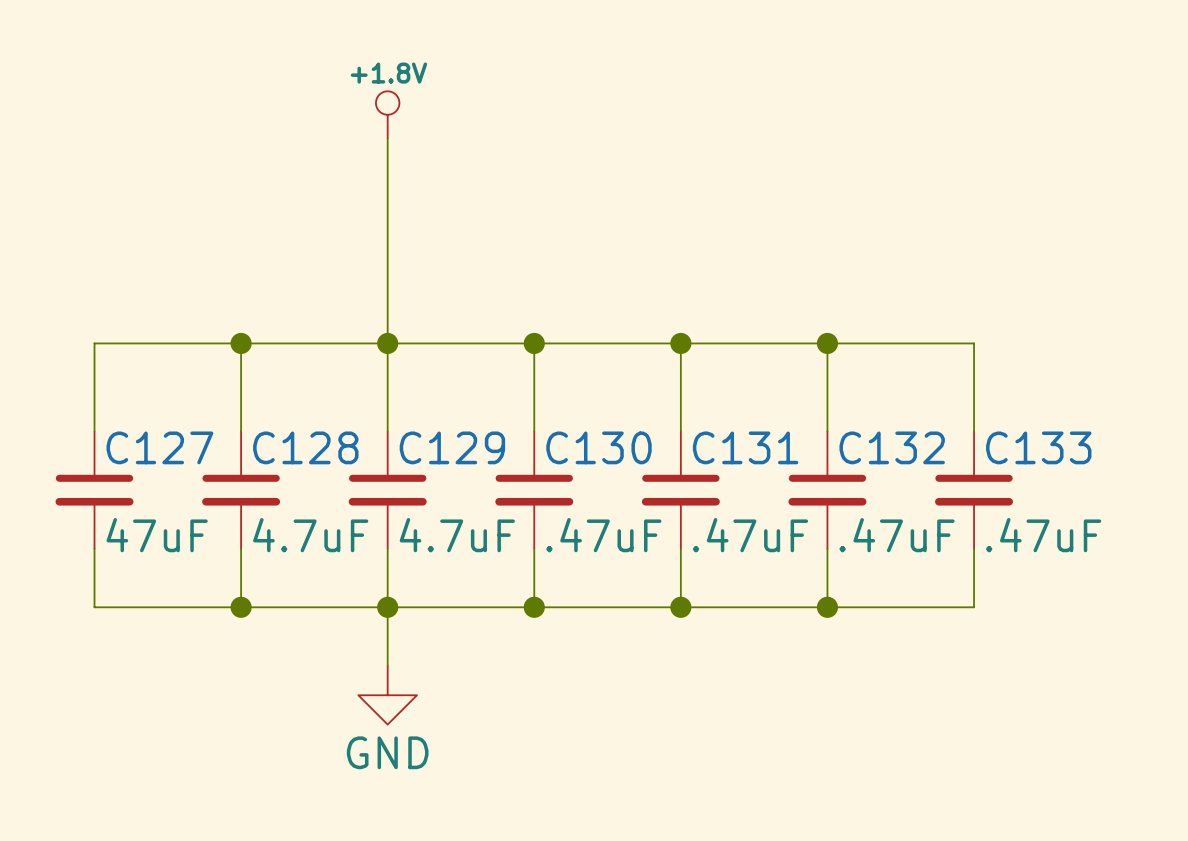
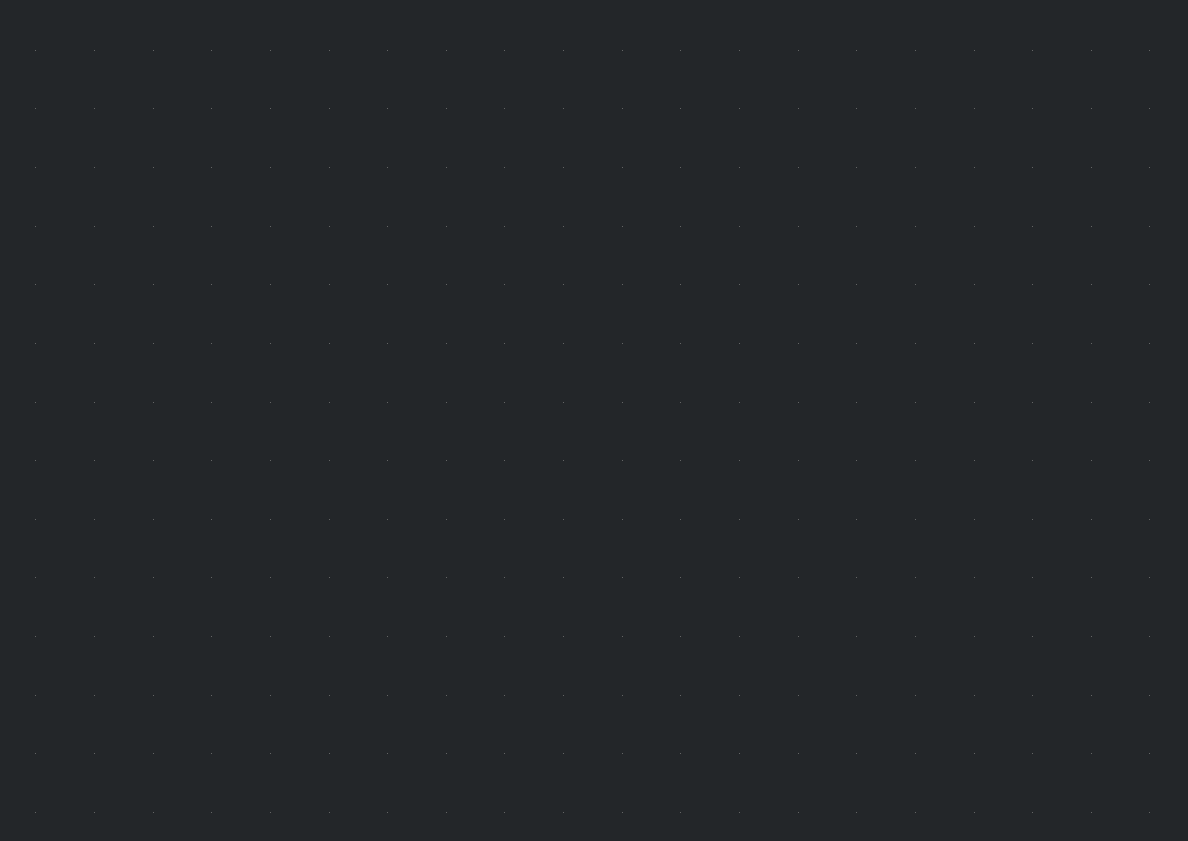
power symbol: +1.8V (387, 114) -> none
wire: (387, 138) (387, 431) -> none
wire: (241, 343) (241, 431) -> none
junction: (241, 343) -> none
junction: (387, 343) -> none
wire: (534, 343) (534, 431) -> none
junction: (534, 343) -> none
wire: (680, 343) (680, 431) -> none
junction: (680, 343) -> none
wire: (827, 343) (827, 431) -> none
junction: (827, 343) -> none
wire: (94, 431) (94, 343) (974, 343) (974, 431) -> none
C127: 47uF (94, 490) -> none
C128: 4.7uF (241, 490) -> none
C129: 4.7uF (387, 490) -> none
C130: .47uF (534, 490) -> none
C131: .47uF (680, 490) -> none
C132: .47uF (827, 490) -> none
C133: .47uF (974, 490) -> none
wire: (94, 548) (94, 607) (974, 607) (974, 548) -> none
wire: (241, 548) (241, 607) -> none
wire: (387, 548) (387, 665) -> none
wire: (534, 548) (534, 607) -> none
wire: (680, 548) (680, 607) -> none
wire: (827, 548) (827, 607) -> none
junction: (241, 607) -> none
junction: (387, 607) -> none
junction: (534, 607) -> none
junction: (680, 607) -> none
junction: (827, 607) -> none
power symbol: GND (387, 695) -> none

